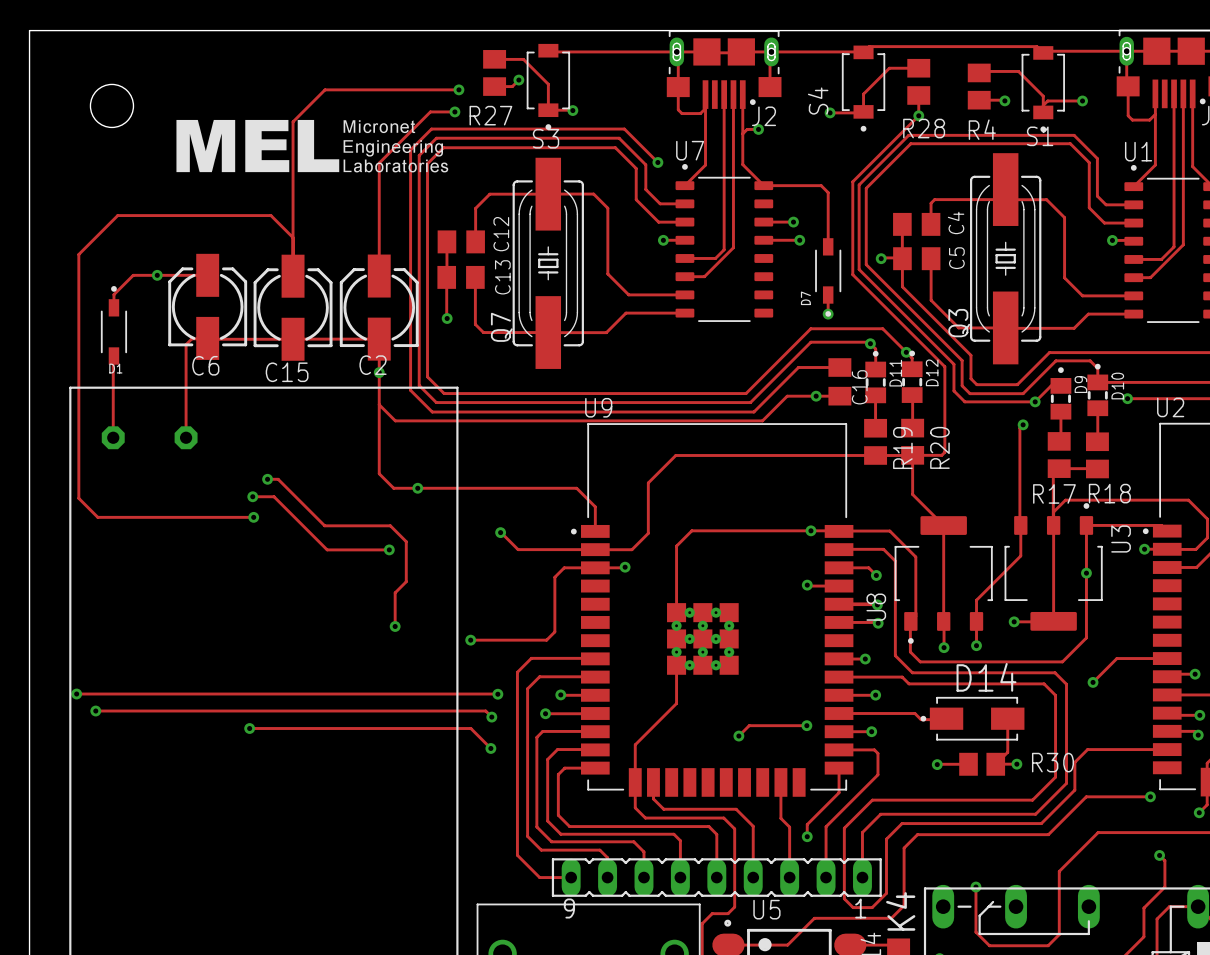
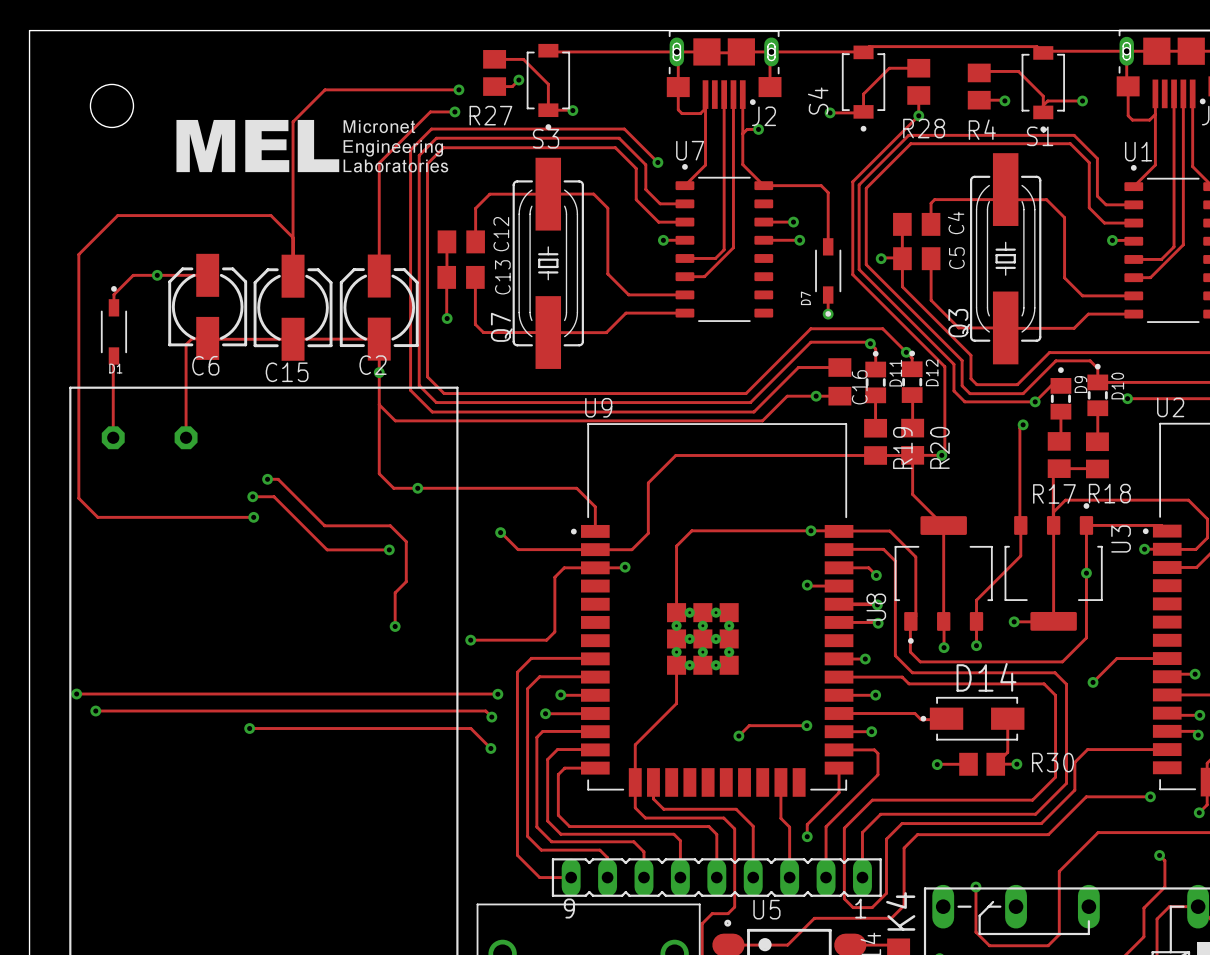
via: none -> (941, 455)

